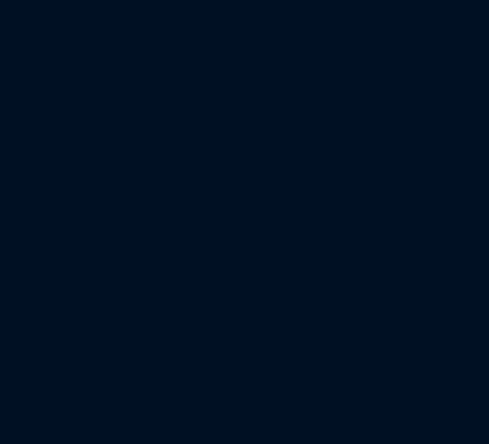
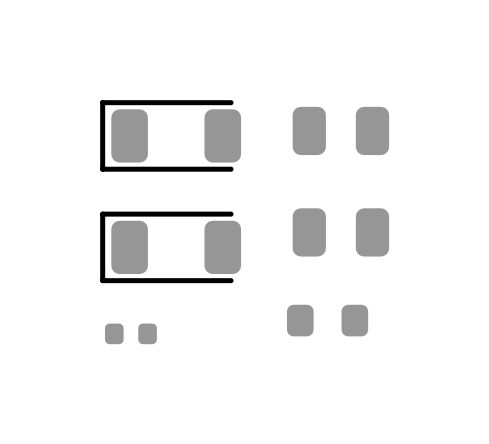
part: none -> (340, 130)
part: none -> (170, 135)
part: none -> (340, 232)
part: none -> (170, 247)
part: none -> (327, 320)
part: none -> (130, 333)

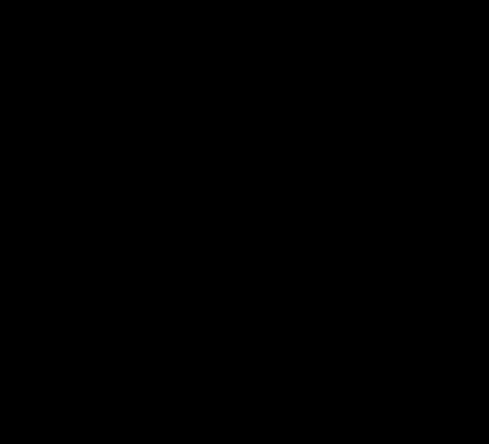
part: (340, 130) -> none
part: (170, 135) -> none
part: (340, 232) -> none
part: (170, 247) -> none
part: (327, 320) -> none
part: (130, 333) -> none

